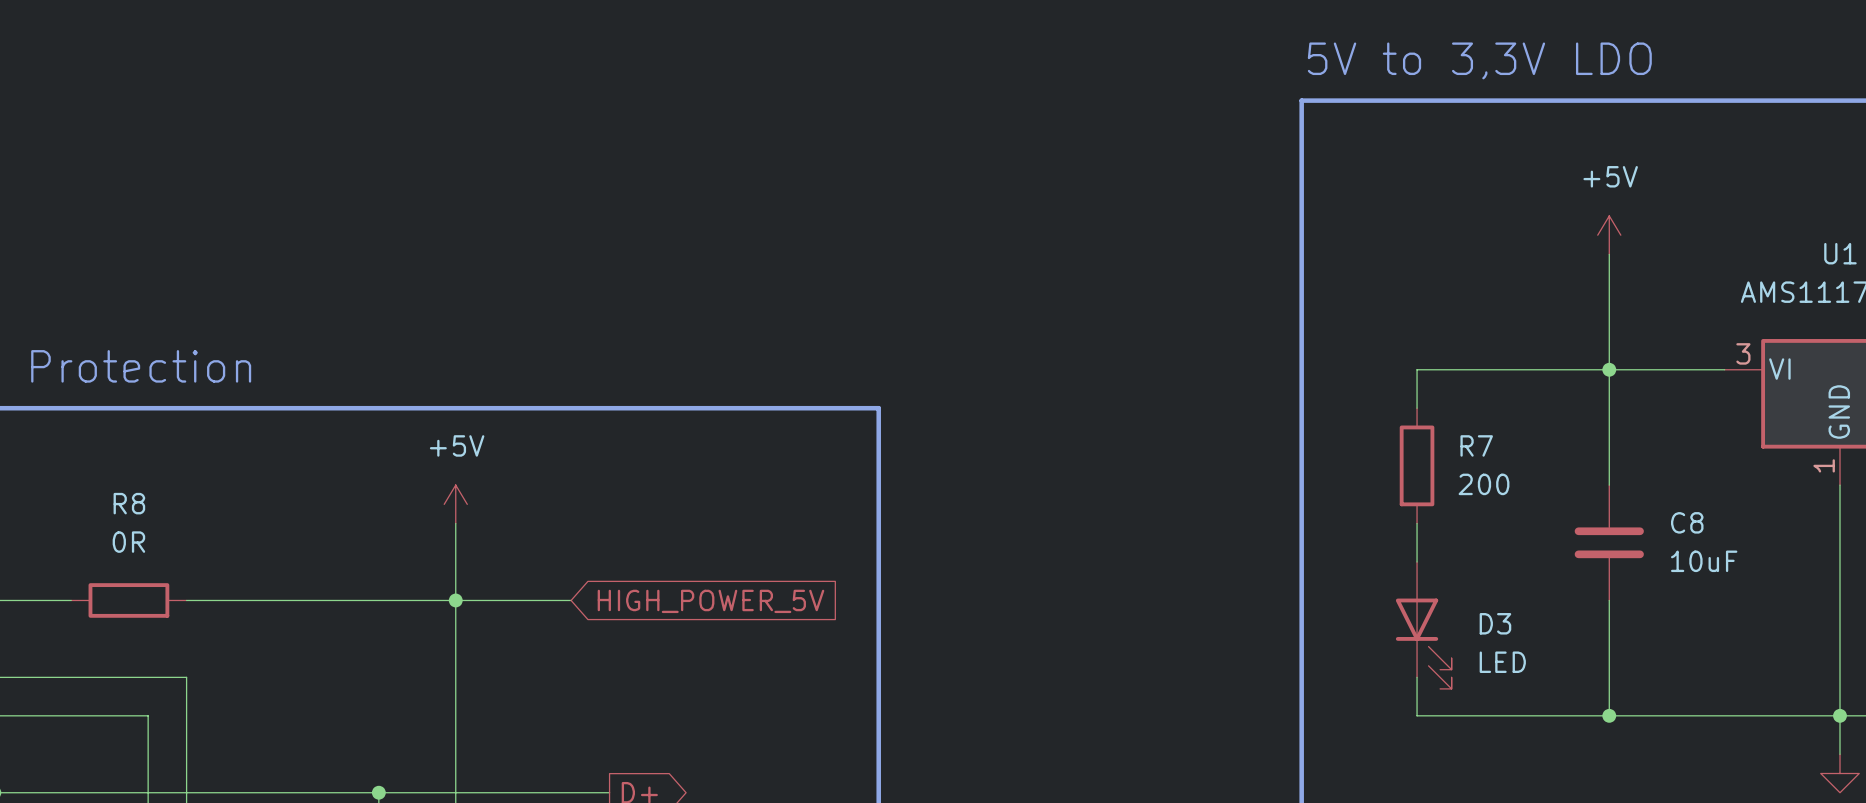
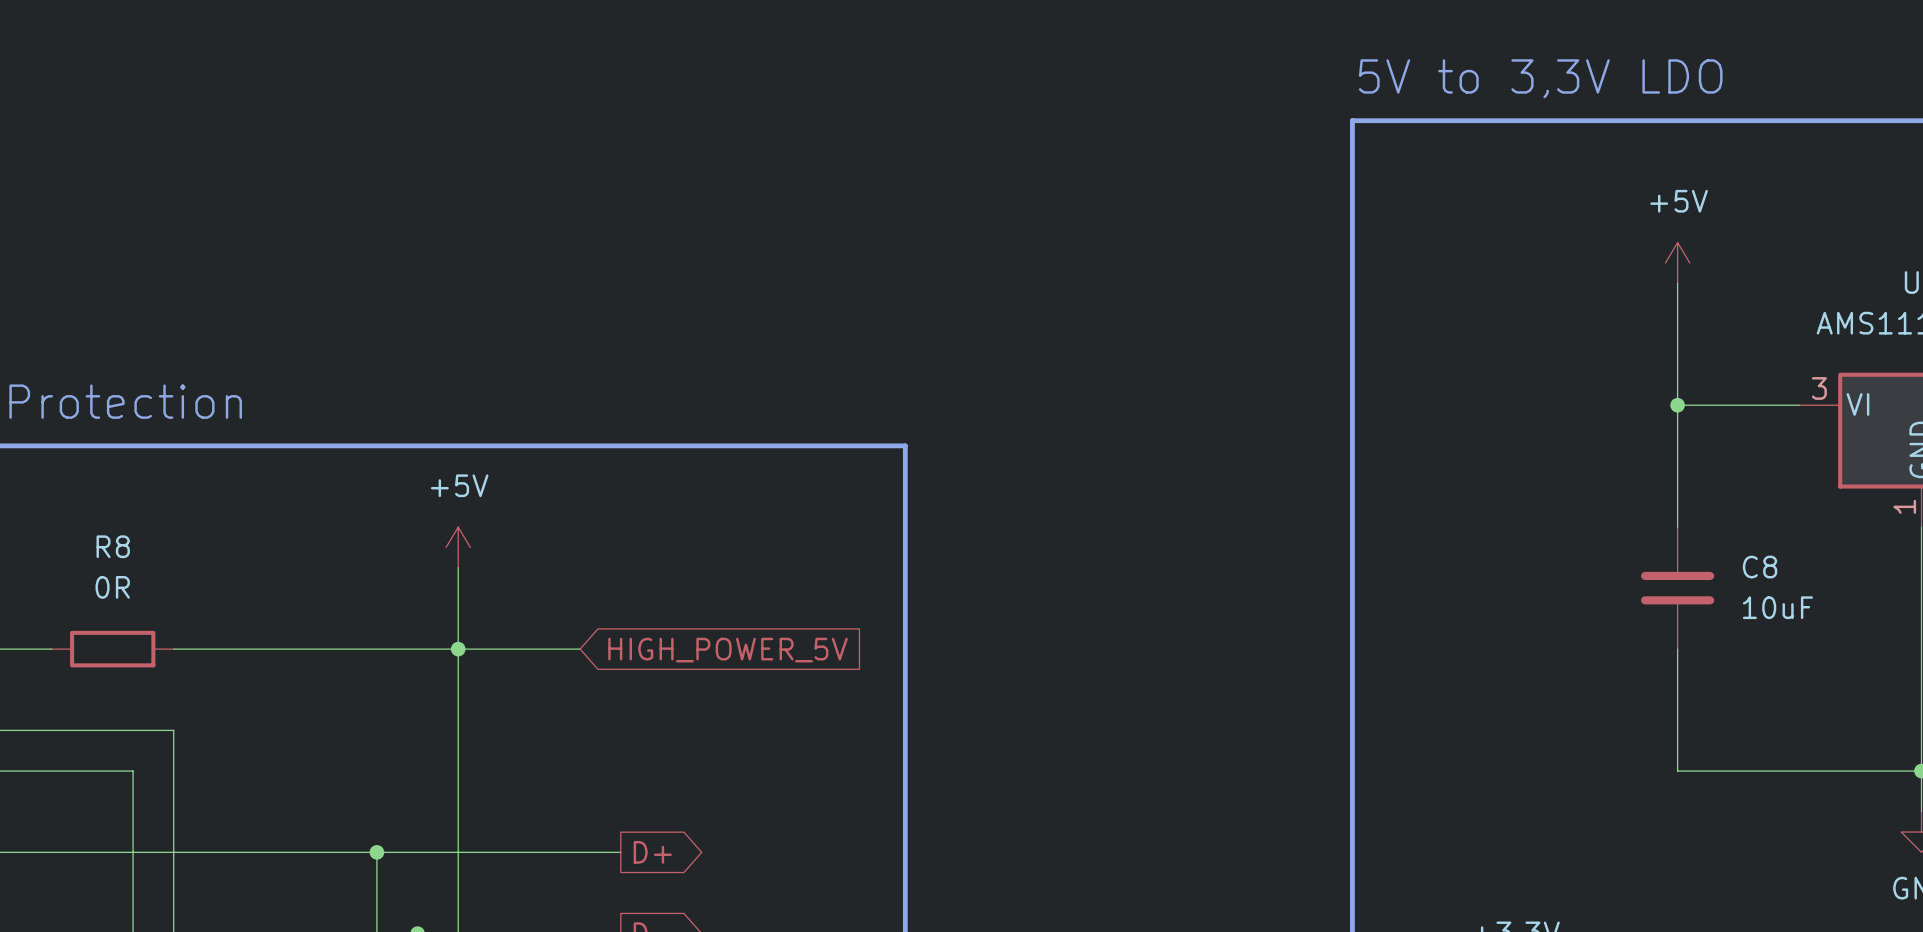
wire: (1609, 369) (1417, 369) (1417, 408) -> none
R7: 200 (1417, 465) -> none
wire: (1417, 523) (1417, 562) -> none
D3: LED (1423, 625) -> none
wire: (1417, 677) (1417, 715) (1609, 715) -> none
junction: (1609, 715) -> none

